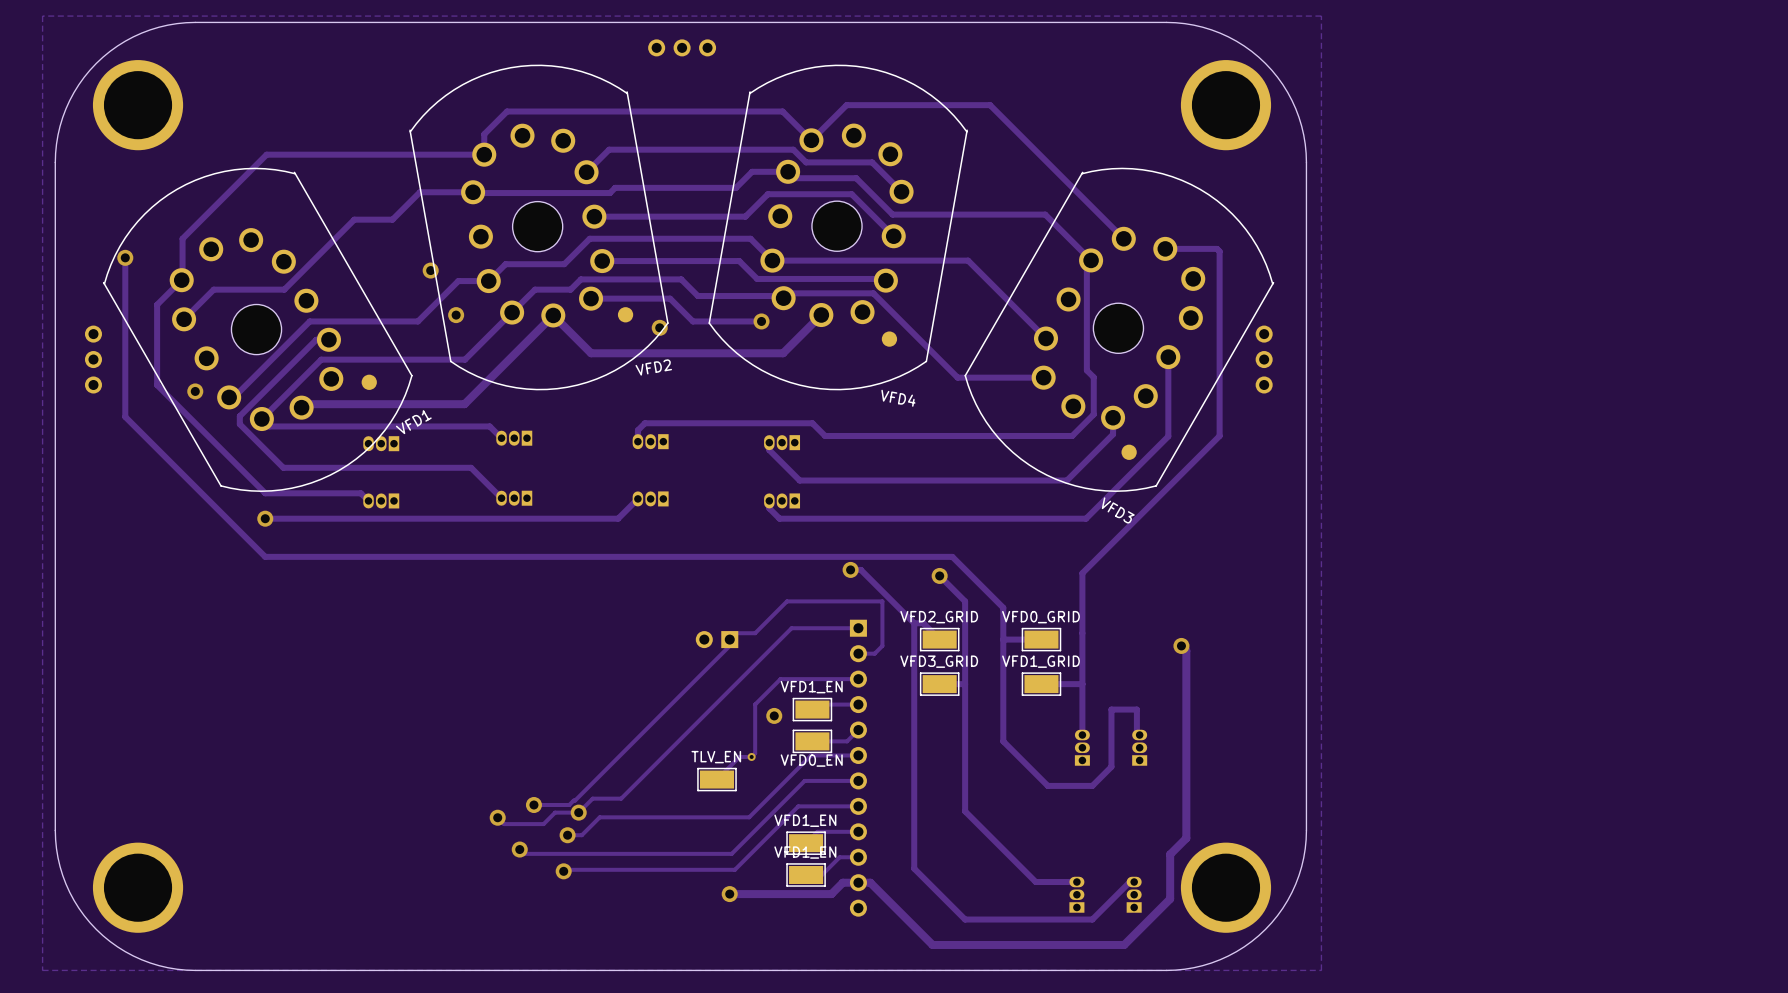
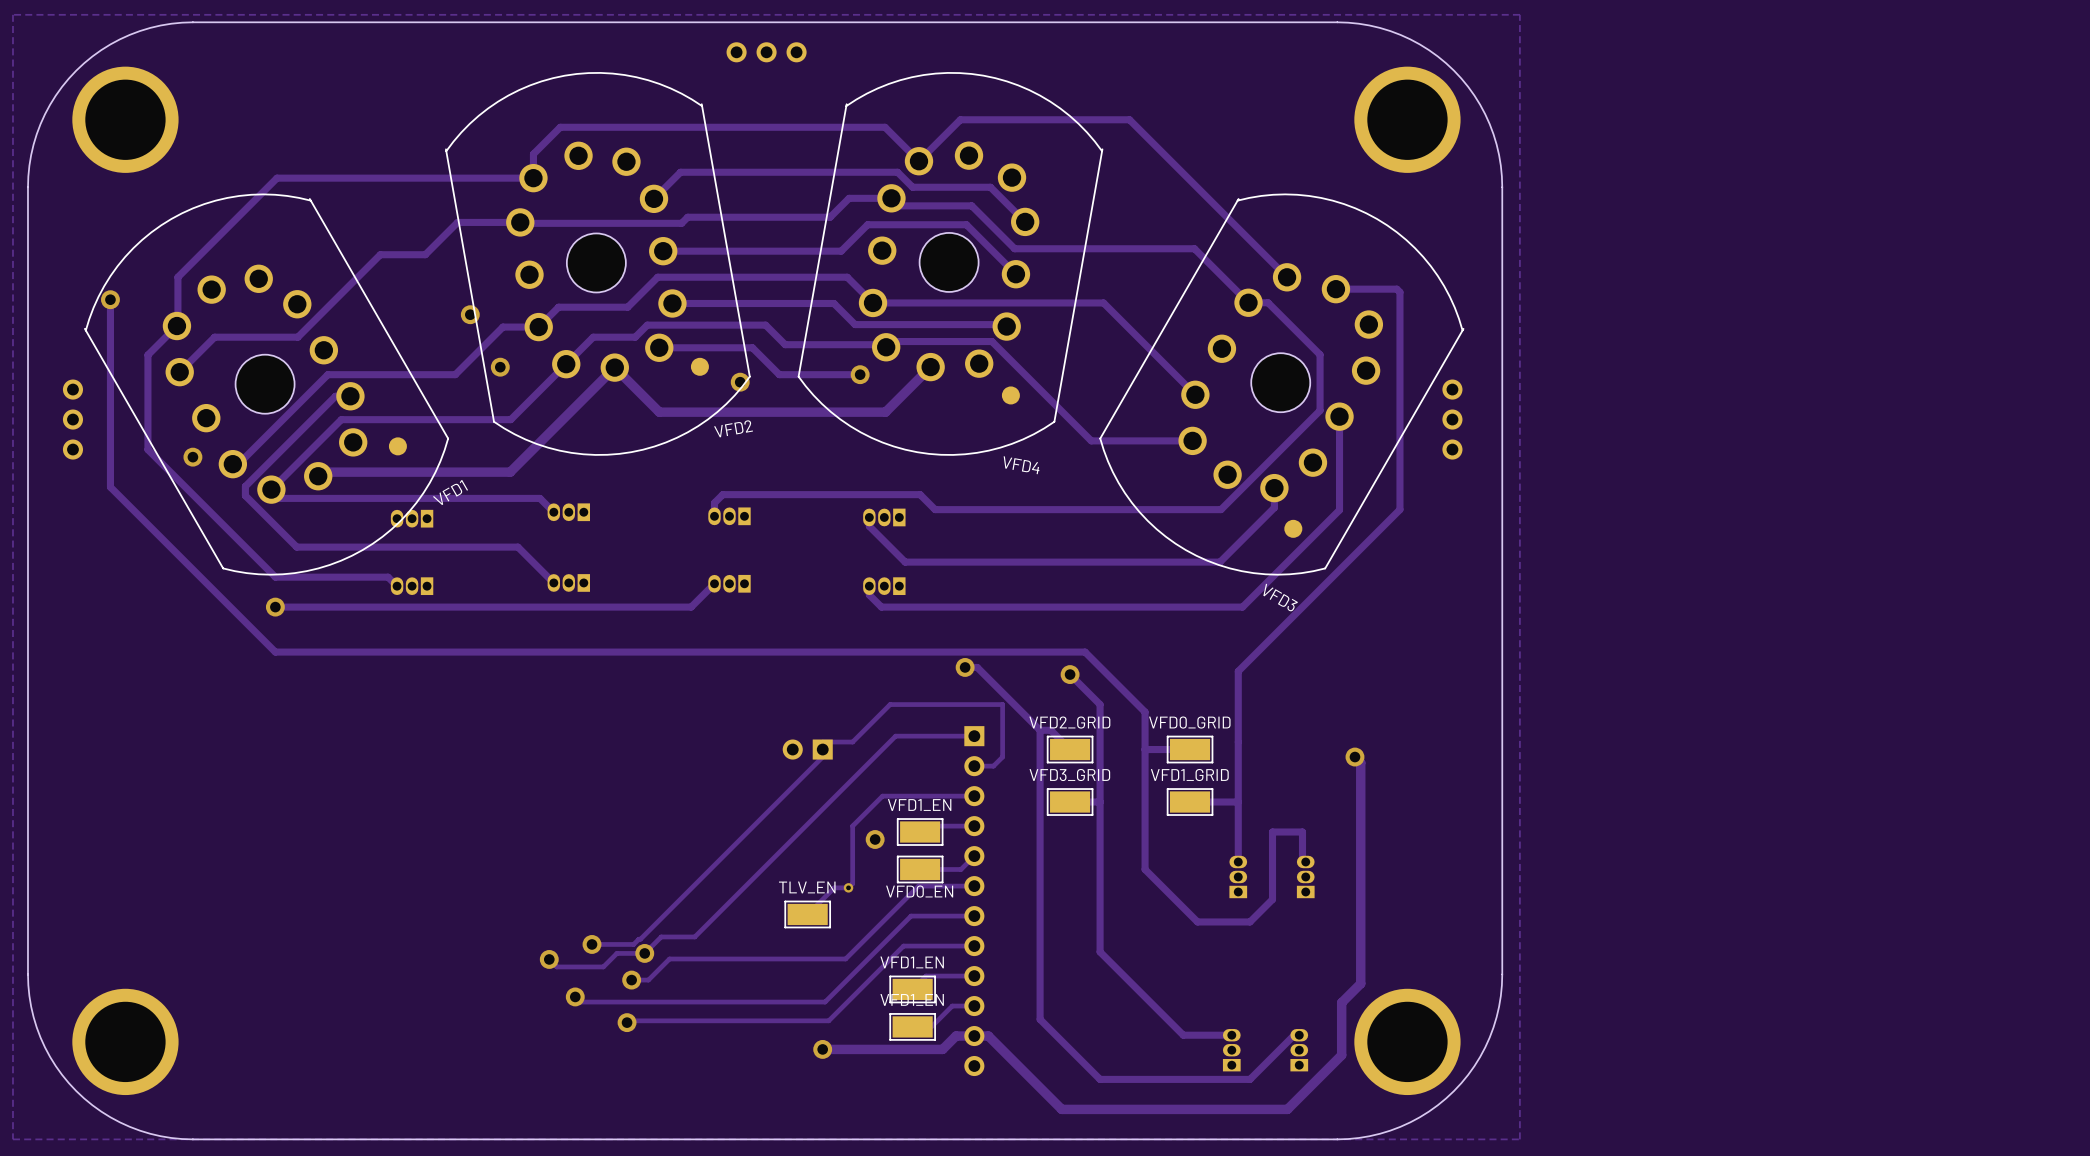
track: (1091, 260) (1086, 264) (1086, 370) (1093, 377) (1093, 414) (1072, 435) (1067, 435) -> (1248, 302) (1268, 302) (1320, 354) (1320, 410) (1221, 509)

